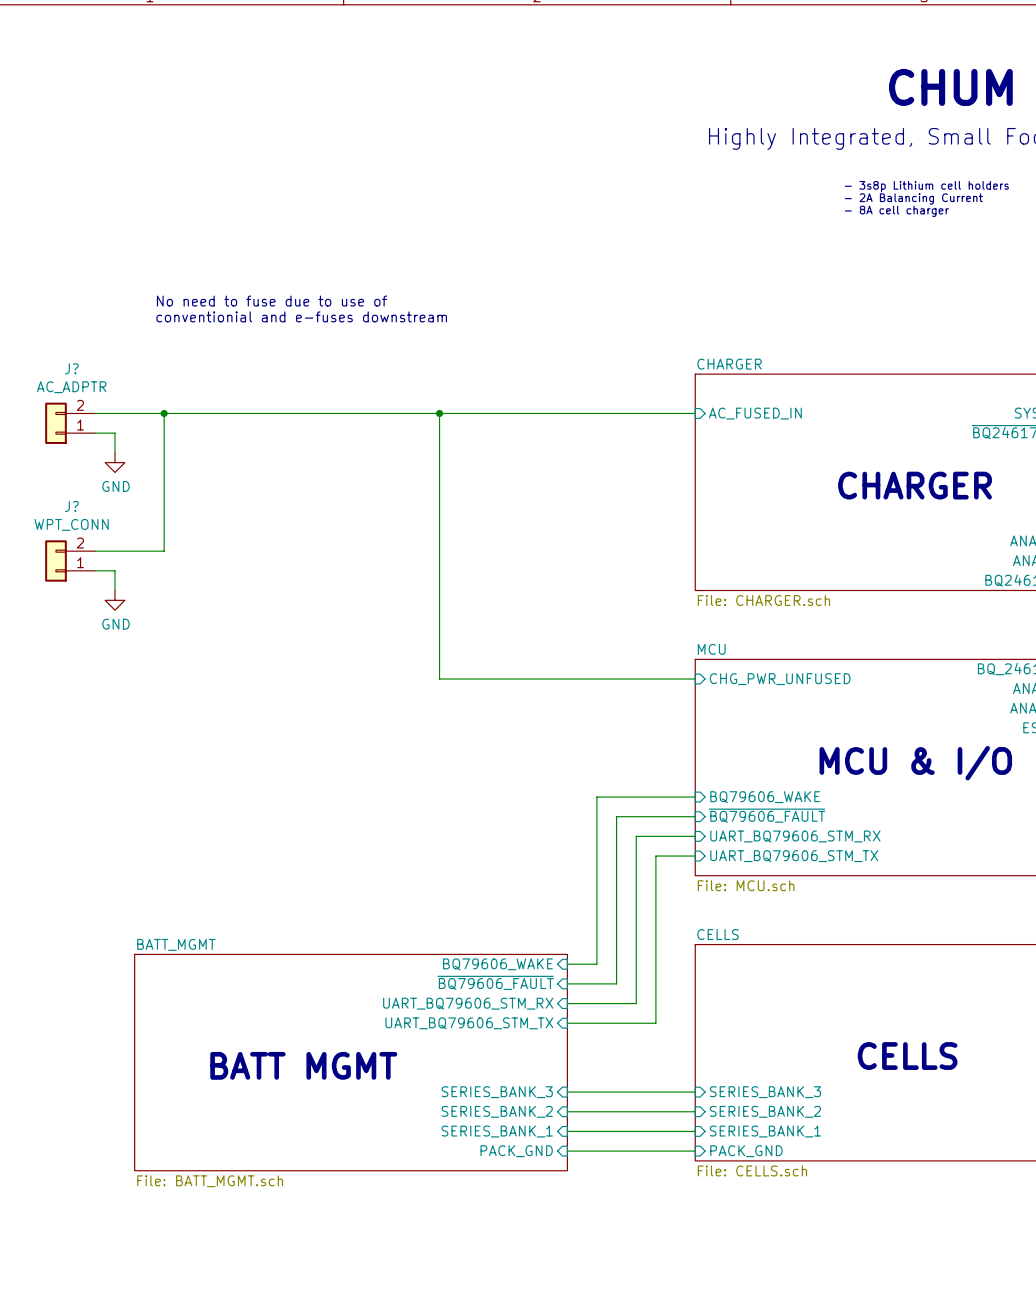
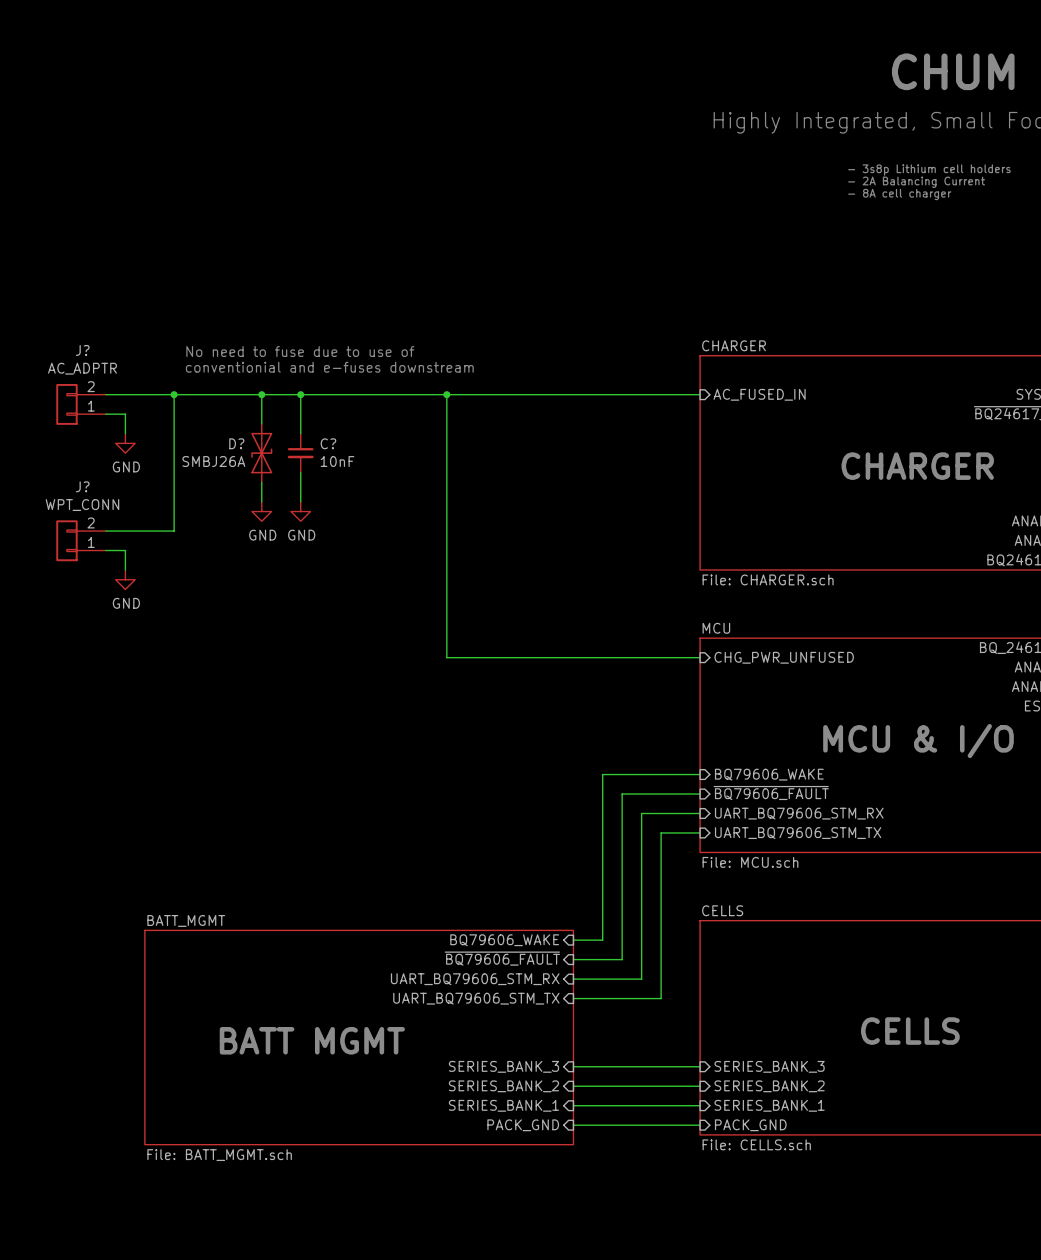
text position: No need to fuse due to use of (271, 301) -> No need to fuse due to use of (300, 351)
text position: conventionial and e-fuses downstream (301, 316) -> conventionial and e-fuses downstream (329, 367)
wire: none -> (261, 394) (261, 423)
junction: none -> (261, 394)
wire: none -> (300, 394) (300, 433)
junction: none -> (300, 394)
D?: none -> SMBJ26A (261, 453)
C?: none -> 10nF (300, 453)
wire: none -> (300, 472) (300, 501)
wire: none -> (261, 482) (261, 501)
power symbol: none -> GND (261, 511)
power symbol: none -> GND (300, 511)

